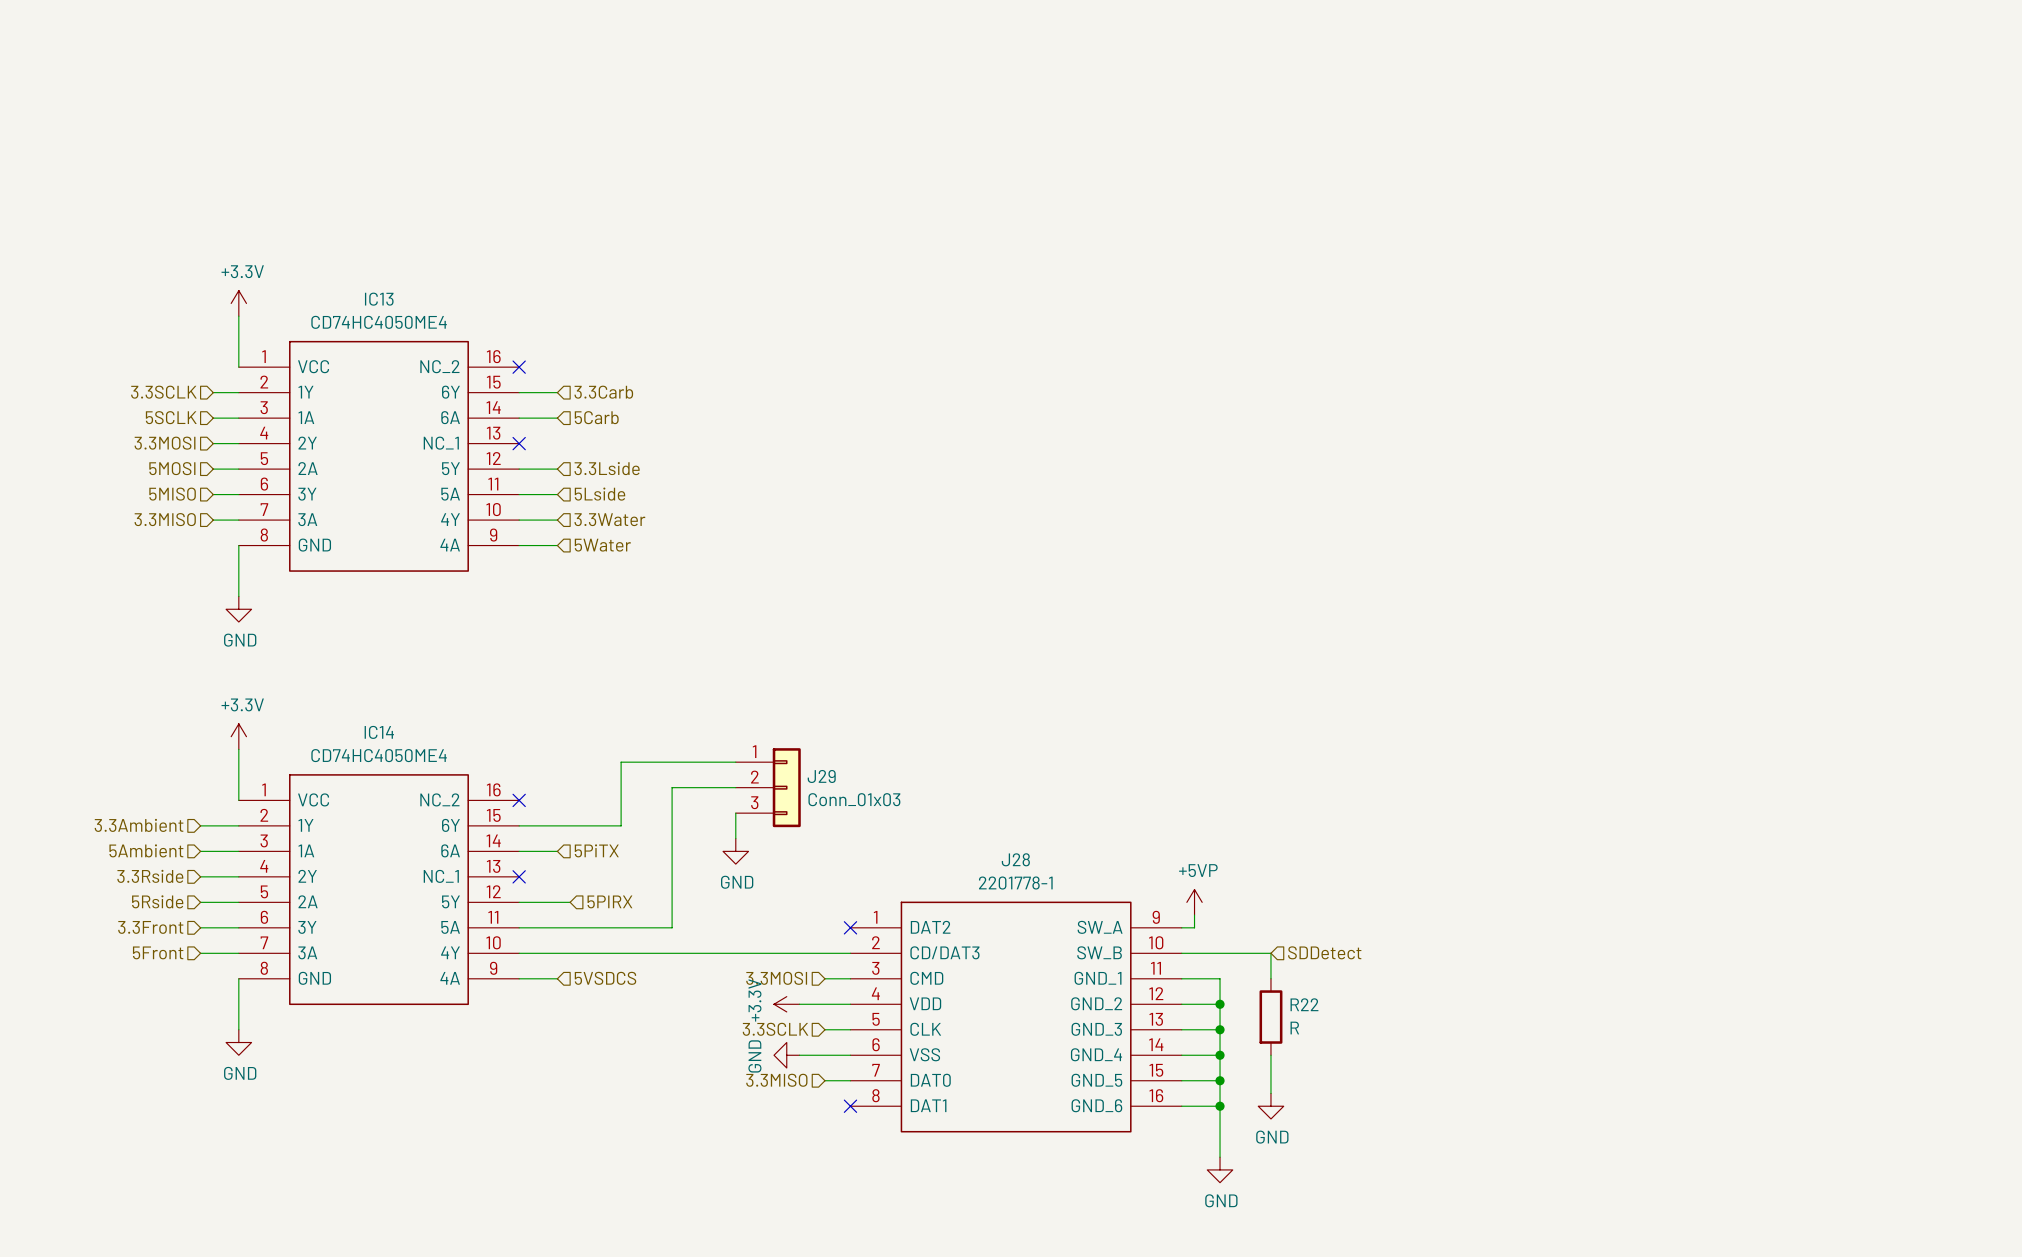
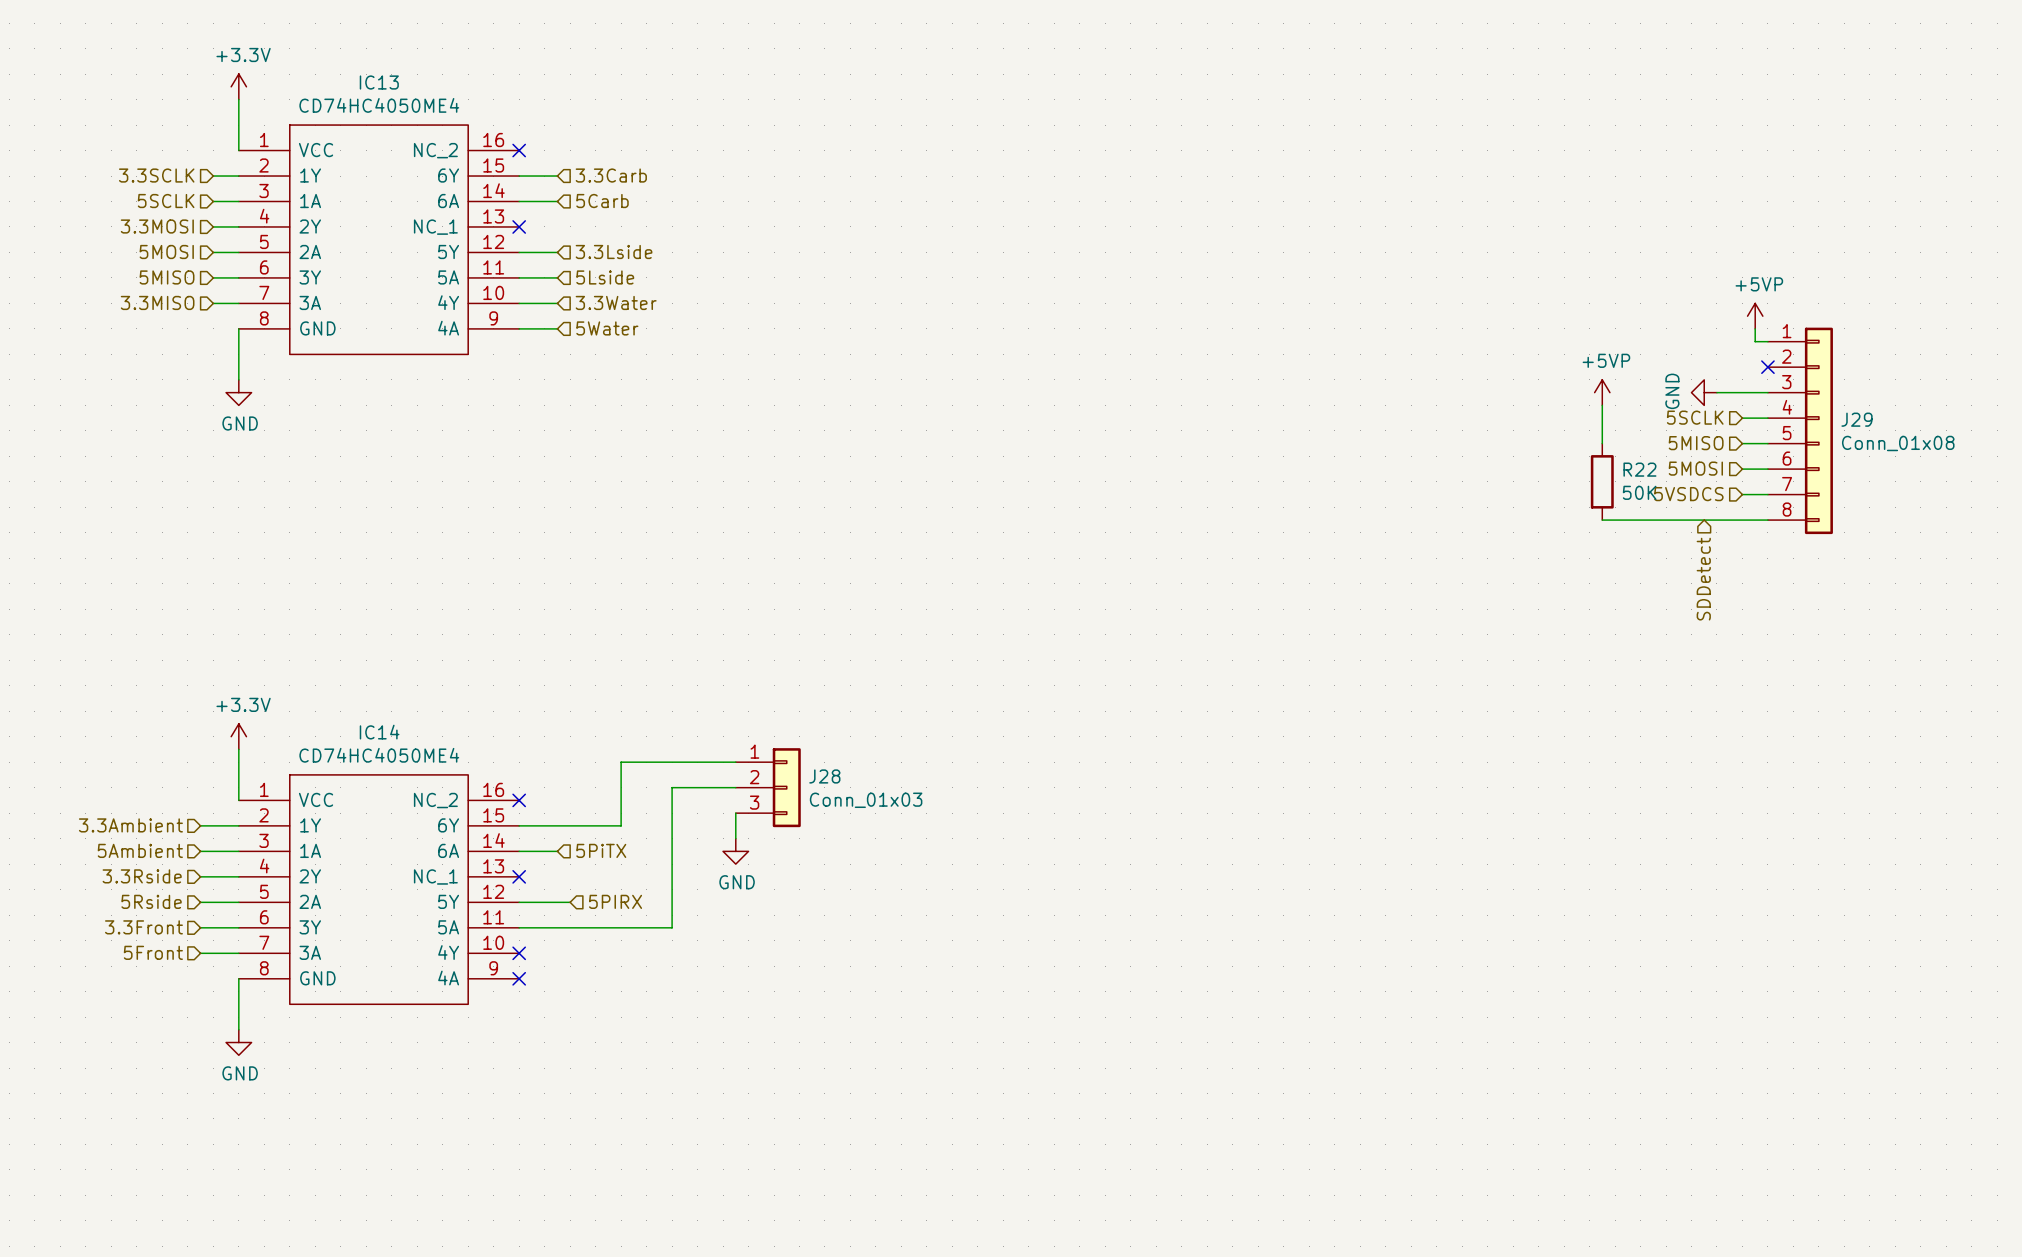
wire: none -> (238, 99) (238, 150)
no-connect mark: none -> (519, 150)
no-connect mark: none -> (519, 226)
power symbol position: +3.3V (238, 303) -> +3.3V (238, 86)
wire: (238, 316) (238, 328) -> (238, 367) (238, 379)
power symbol: none -> +5VP (1755, 316)
wire: none -> (1755, 328) (1755, 341) (1767, 341)
no-connect mark: (519, 367) -> none
no-connect mark: none -> (1767, 367)
hierarchical label position: 3.3SCLK (163, 392) -> 3.3SCLK (156, 175)
wire: (213, 392) (238, 392) -> (213, 176) (238, 176)
wire: (519, 392) (557, 392) -> (519, 176) (557, 176)
hierarchical label position: 3.3Carb (603, 392) -> 3.3Carb (611, 175)
power symbol: none -> +5VP (1602, 392)
power symbol: none -> GND (1704, 392)
wire: none -> (1716, 392) (1767, 392)
wire: none -> (1602, 405) (1602, 443)
hierarchical label position: 5SCLK (171, 417) -> 5SCLK (166, 201)
hierarchical label position: 5Carb (596, 417) -> 5Carb (602, 201)
hierarchical label: none -> 5SCLK (1695, 417)
wire: (213, 418) (238, 418) -> (213, 201) (238, 201)
wire: (519, 418) (557, 418) -> (519, 201) (557, 201)
wire: none -> (1742, 418) (1767, 418)
J29: none -> Conn_01x08 (1800, 430)
hierarchical label position: 3.3MOSI (165, 443) -> 3.3MOSI (157, 226)
wire: (213, 443) (238, 443) -> (213, 226) (238, 226)
no-connect mark: (519, 443) -> none
hierarchical label: none -> 5MISO (1696, 443)
wire: none -> (1742, 443) (1767, 443)
IC13 position: (378, 456) -> (378, 239)
hierarchical label position: 5MOSI (172, 468) -> 5MOSI (166, 251)
hierarchical label position: 3.3Lside (607, 468) -> 3.3Lside (614, 251)
hierarchical label: none -> 5MOSI (1695, 468)
wire: (213, 469) (238, 469) -> (213, 252) (238, 252)
wire: (519, 469) (557, 469) -> (519, 252) (557, 252)
wire: none -> (1742, 469) (1767, 469)
hierarchical label position: 5MISO (172, 494) -> 5MISO (167, 277)
wire: (213, 494) (238, 494) -> (213, 277) (238, 277)
wire: (519, 494) (557, 494) -> (519, 277) (557, 277)
hierarchical label position: 5Lside (599, 494) -> 5Lside (605, 277)
hierarchical label: none -> 5VSDCS (1688, 494)
wire: none -> (1742, 494) (1767, 494)
hierarchical label position: 3.3MISO (165, 519) -> 3.3MISO (157, 302)
hierarchical label position: 3.3Water (609, 519) -> 3.3Water (616, 302)
wire: (213, 520) (238, 520) -> (213, 303) (238, 303)
wire: (519, 520) (557, 520) -> (519, 303) (557, 303)
wire: none -> (1602, 520) (1767, 520)
wire: (238, 545) (238, 596) -> none
wire: (519, 545) (557, 545) -> (519, 328) (557, 328)
hierarchical label position: 5Water (602, 545) -> 5Water (607, 328)
hierarchical label: none -> SDDetect (1703, 579)
power symbol position: GND (238, 609) -> GND (238, 392)
J29 name: J29 (821, 776) -> J28 (824, 776)
power symbol: +5VP (1194, 902) -> none
wire: (1194, 915) (1194, 927) (1181, 927) -> none
no-connect mark: (850, 927) -> none
hierarchical label: SDDetect (1324, 952) -> none
wire: (519, 953) (850, 953) -> none
no-connect mark: none -> (519, 953)
wire: (1181, 953) (1270, 953) (1270, 978) -> none
wire: (519, 978) (557, 978) -> none
no-connect mark: none -> (519, 978)
hierarchical label: 5VSDCS (605, 978) -> none
hierarchical label: 3.3MOSI (776, 978) -> none
wire: (824, 978) (850, 978) -> none
wire: (1181, 978) (1220, 978) (1220, 1157) -> none
power symbol: +3.3V (786, 1004) -> none
wire: (799, 1004) (850, 1004) -> none
wire: (1181, 1004) (1220, 1004) -> none
junction: (1220, 1004) -> none
J28: 2201778-1 (1016, 1017) -> none
R22 position: (1270, 1017) -> (1602, 481)
R22 value: R (1294, 1028) -> 50K (1639, 492)
hierarchical label: 3.3SCLK (775, 1029) -> none
wire: (824, 1029) (850, 1029) -> none
wire: (1181, 1029) (1220, 1029) -> none
junction: (1220, 1029) -> none
power symbol: GND (786, 1055) -> none
wire: (799, 1055) (850, 1055) -> none
wire: (1181, 1055) (1220, 1055) -> none
junction: (1220, 1055) -> none
wire: (1270, 1055) (1270, 1093) -> none
hierarchical label: 3.3MISO (776, 1080) -> none
wire: (824, 1080) (850, 1080) -> none
wire: (1181, 1080) (1220, 1080) -> none
junction: (1220, 1080) -> none
no-connect mark: (850, 1106) -> none
wire: (1181, 1106) (1220, 1106) -> none
junction: (1220, 1106) -> none
power symbol: GND (1270, 1106) -> none
power symbol: GND (1220, 1169) -> none

